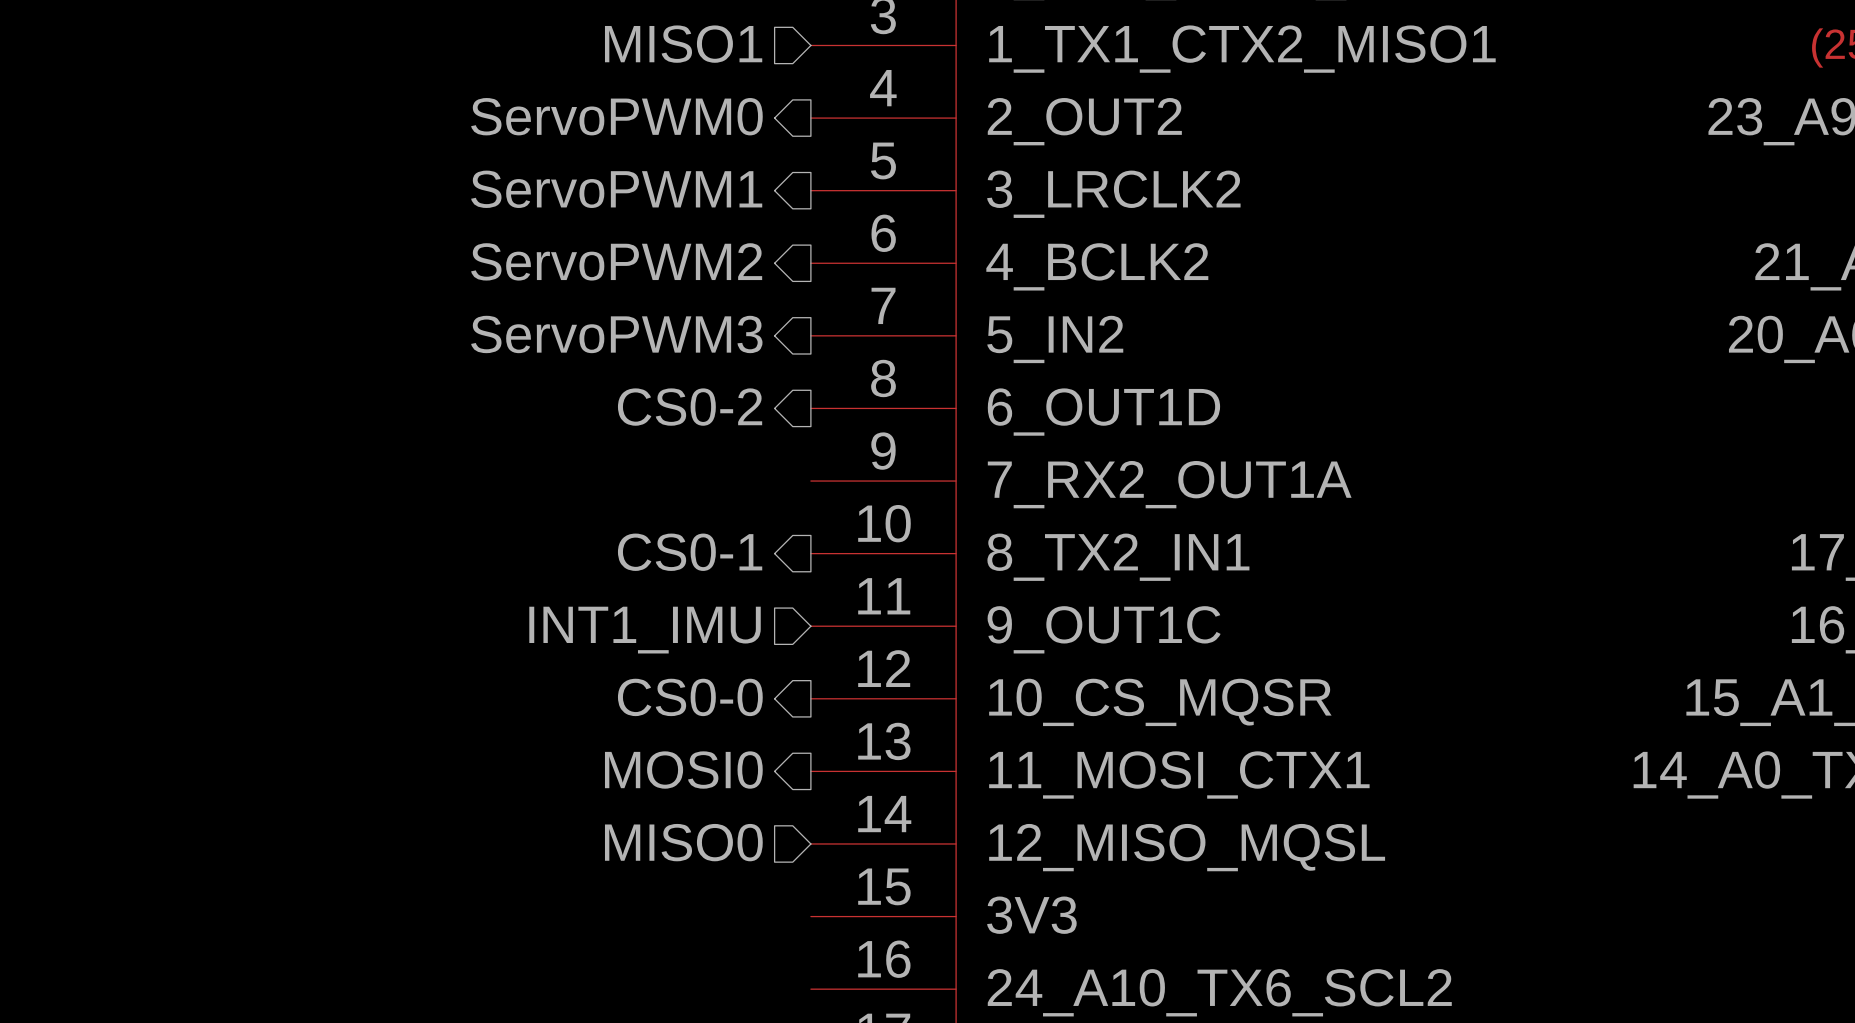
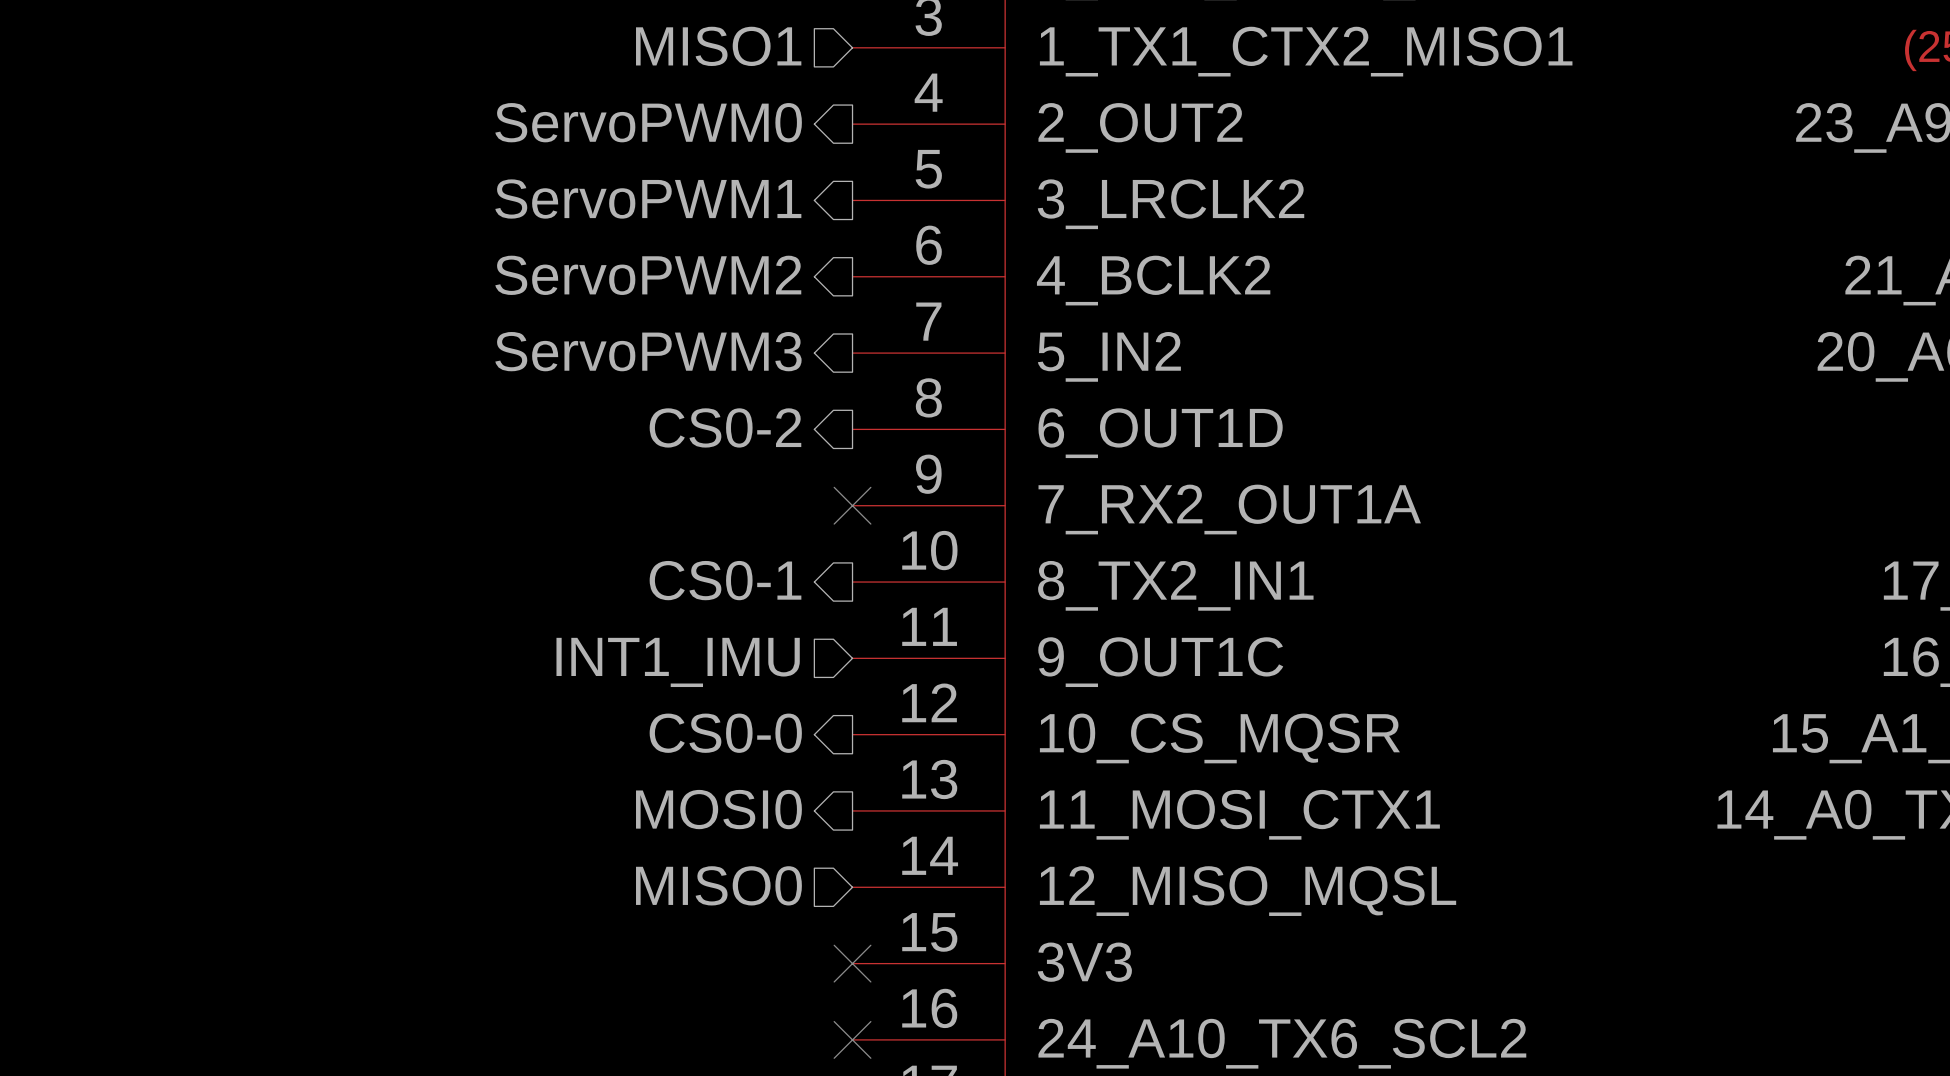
no-connect mark: none -> (852, 505)
no-connect mark: none -> (852, 963)
no-connect mark: none -> (852, 1039)

